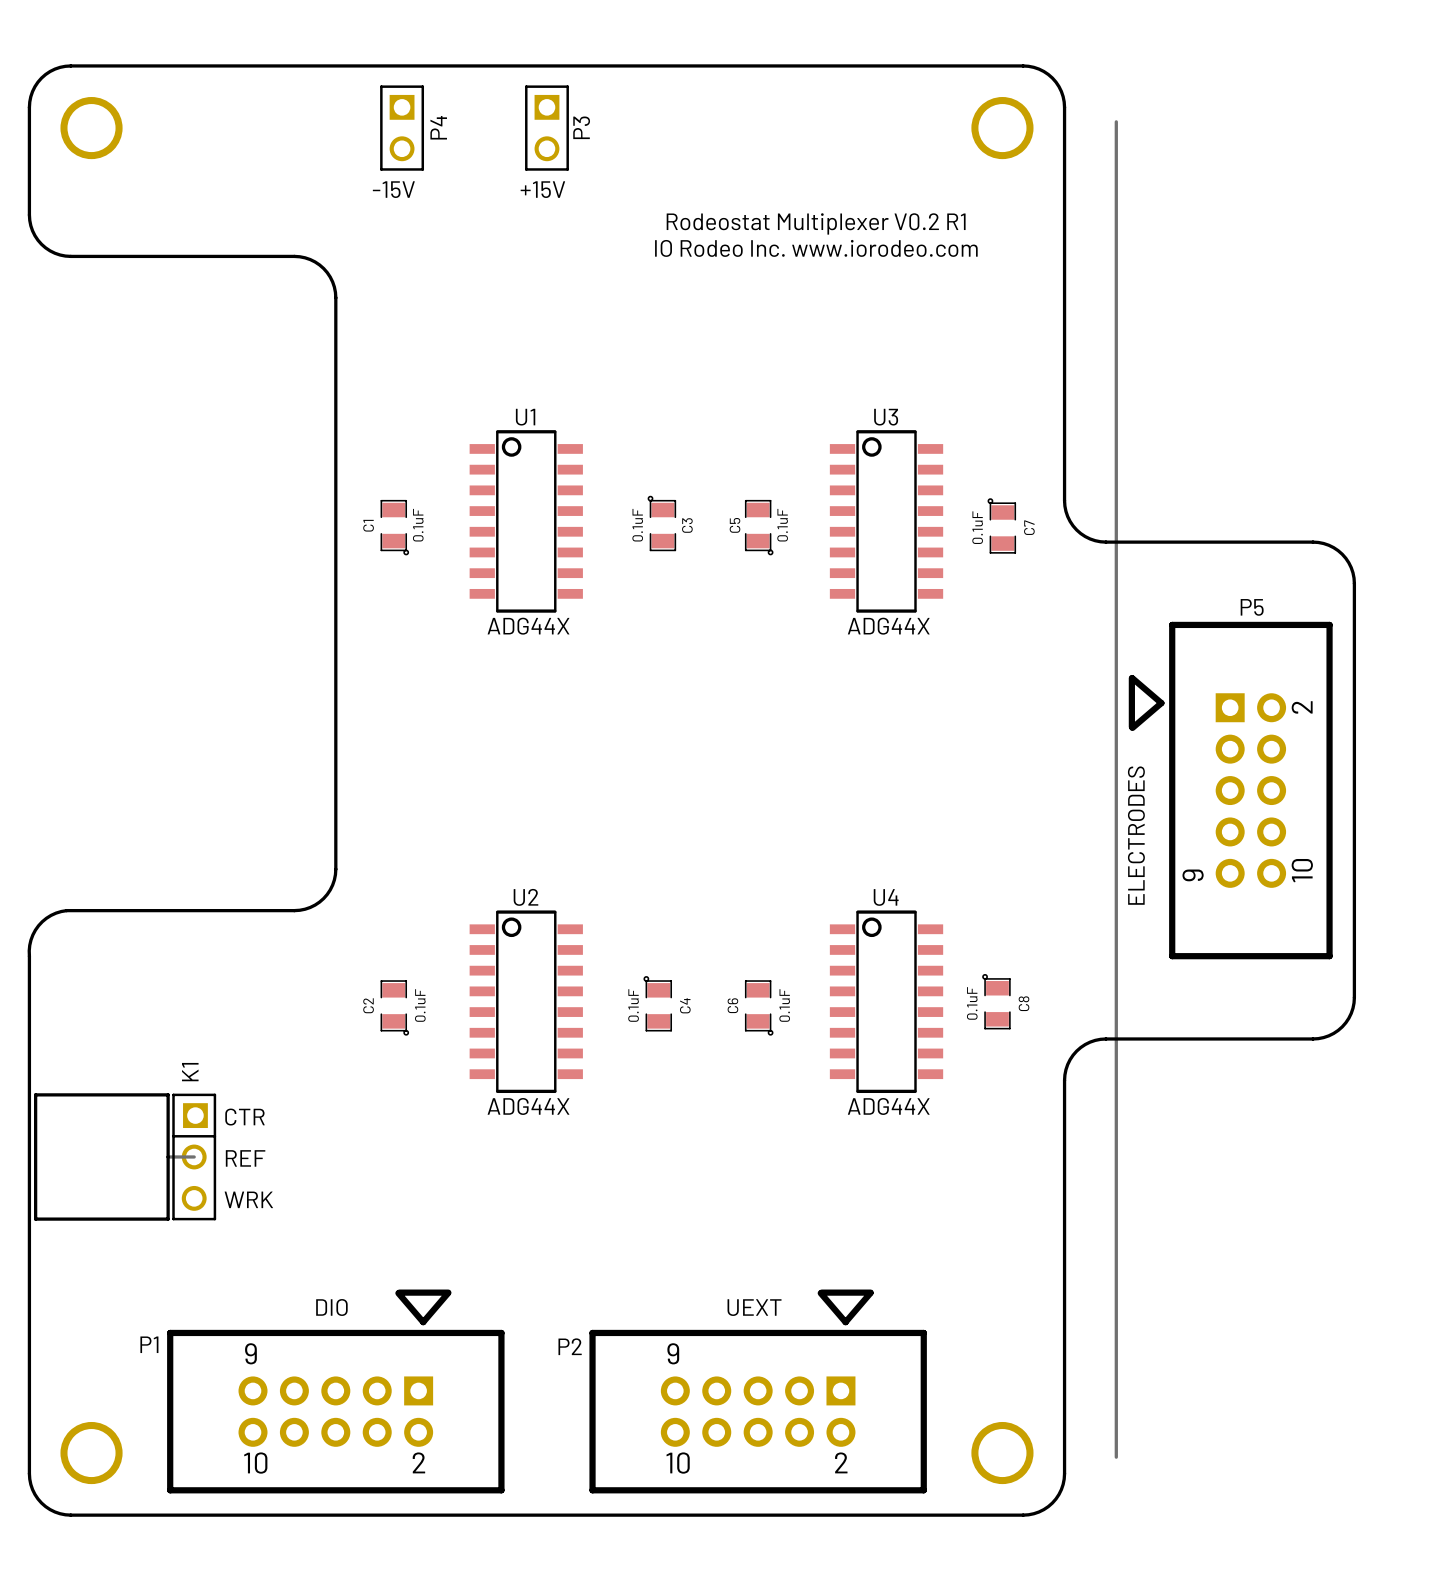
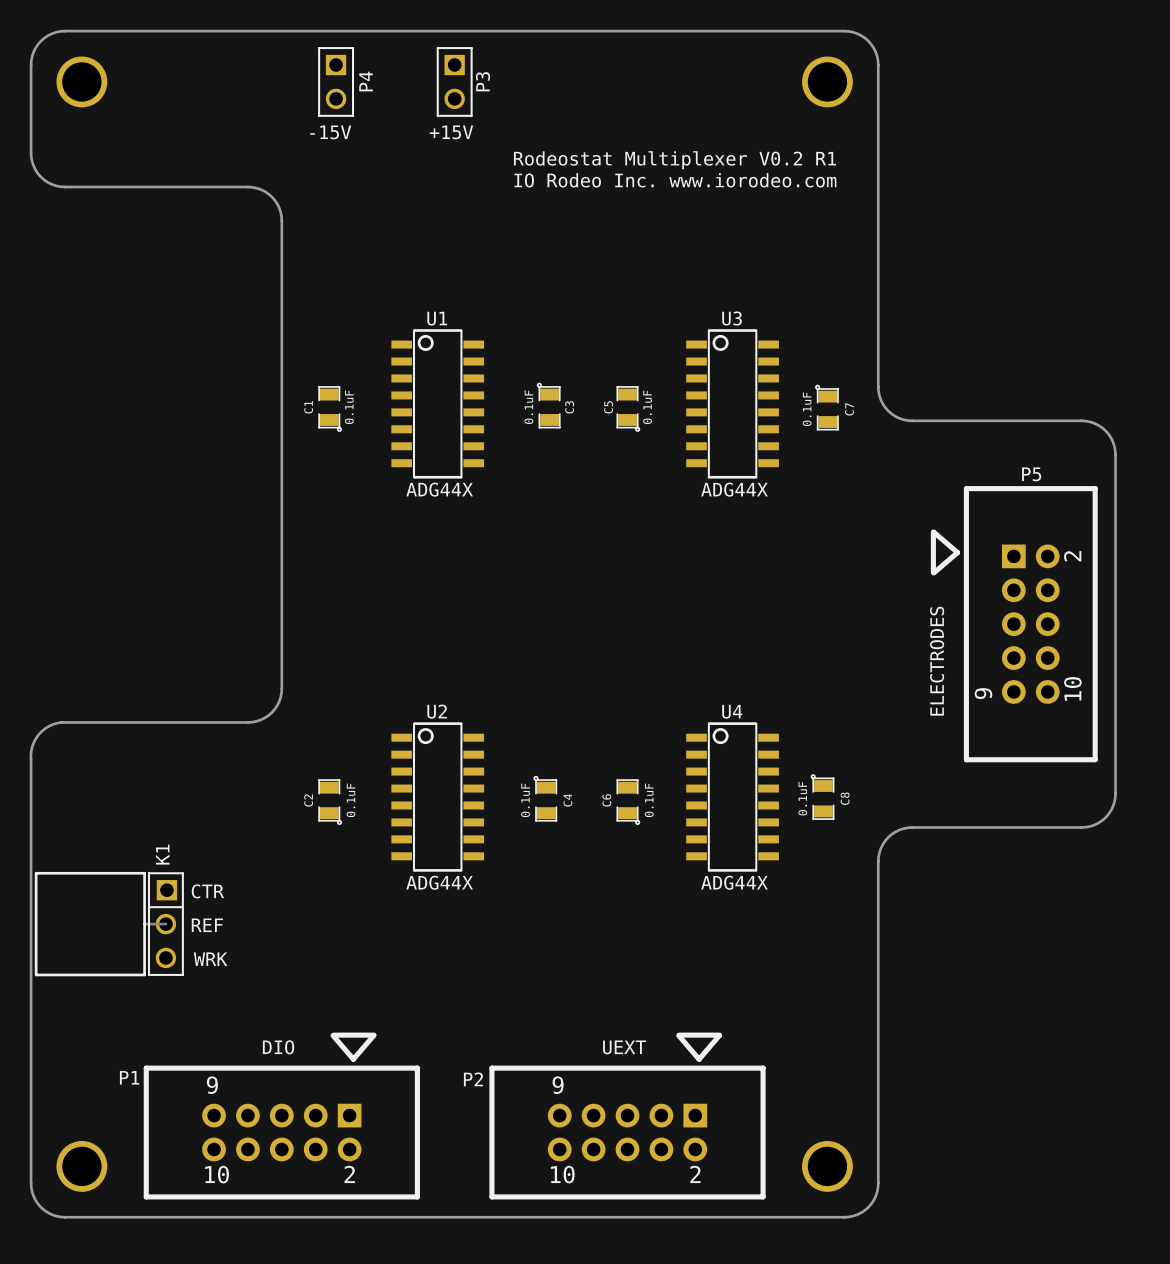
line: (1116, 121) (1116, 1457) -> none

